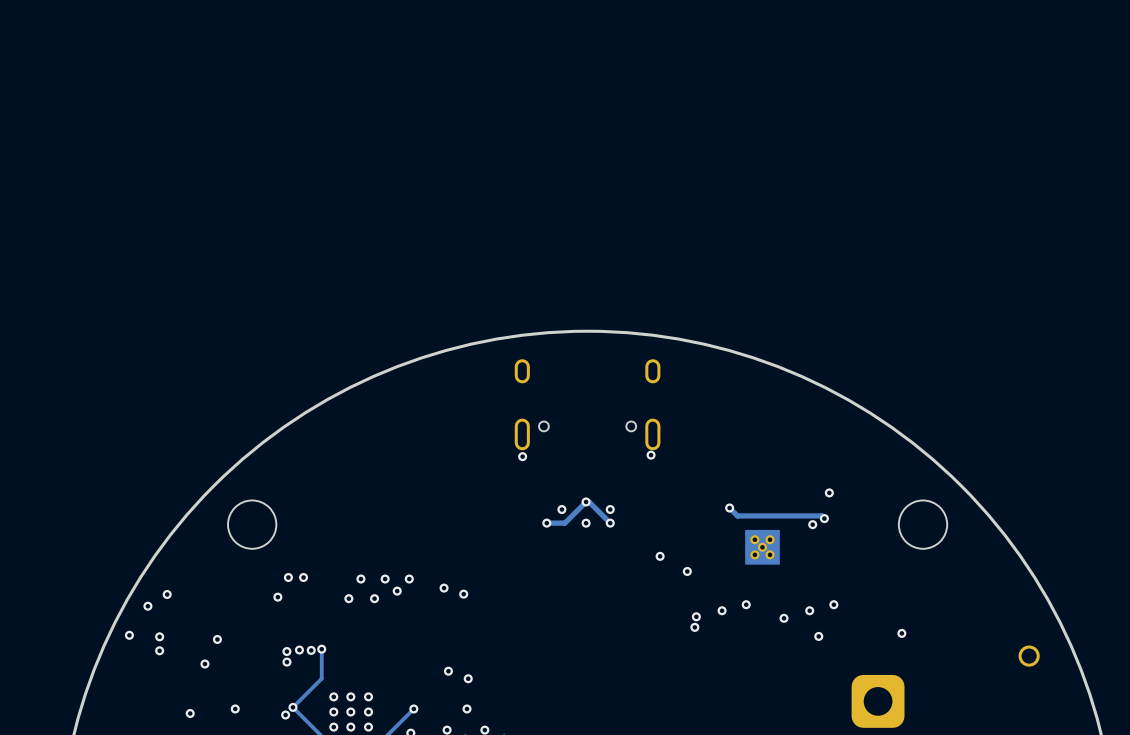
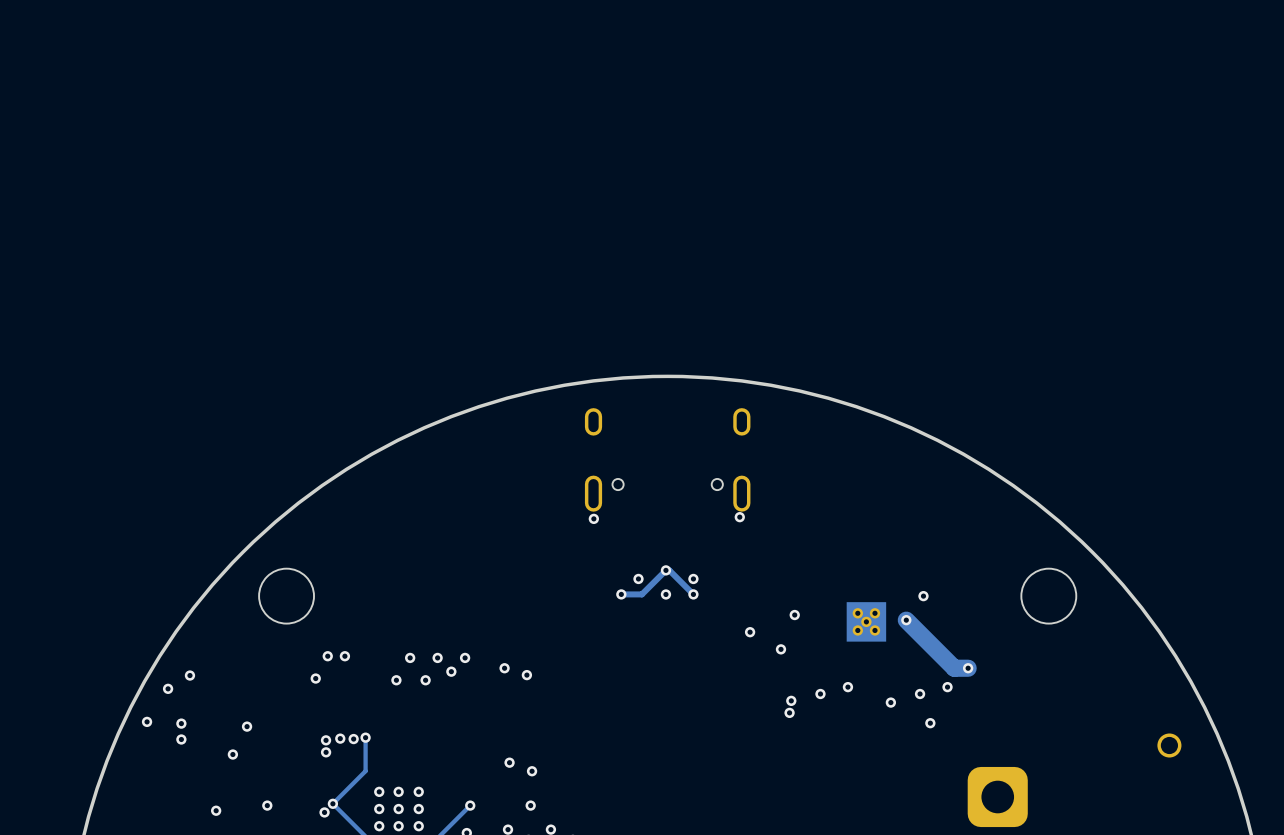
via: (829, 492) -> none
track: (729, 508) (737, 515) (821, 515) (824, 518) -> none
via: (729, 508) -> none
via: (824, 518) -> none
via: none -> (794, 615)
track: none -> (906, 620) (954, 668) (968, 668)
via: none -> (906, 620)
via: none -> (968, 668)
via: (901, 633) -> none

